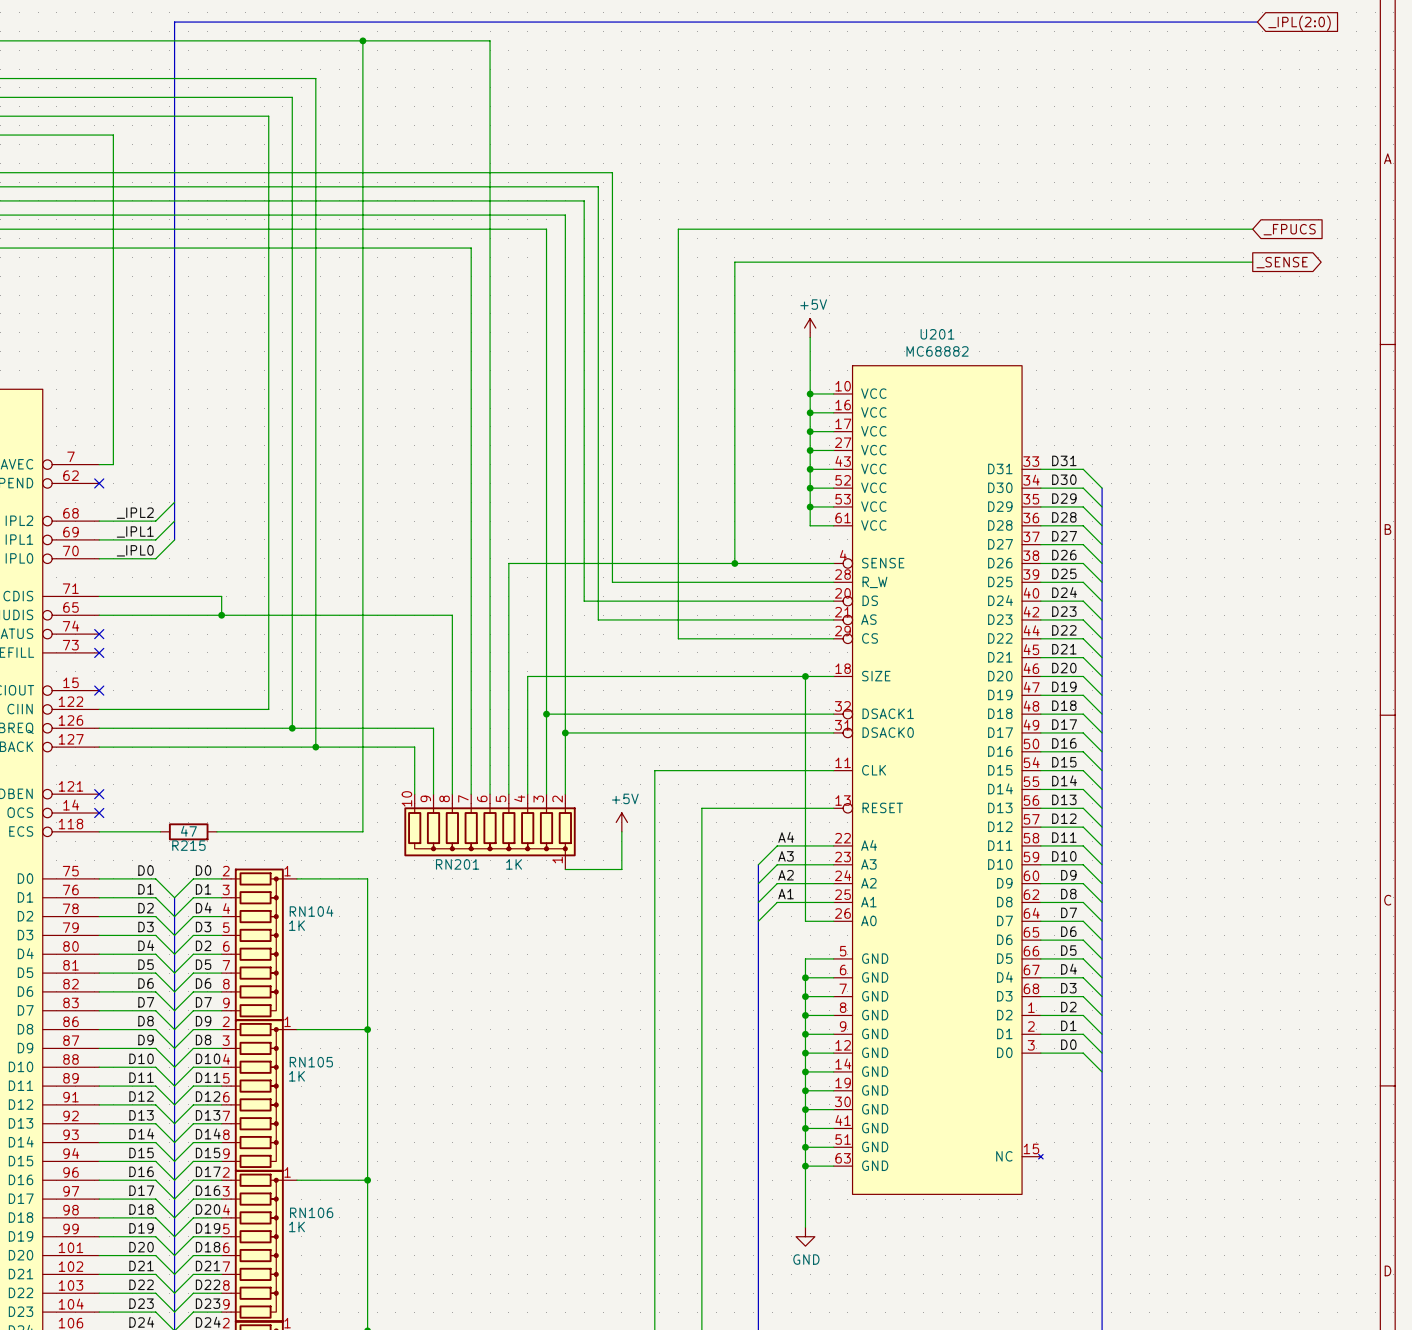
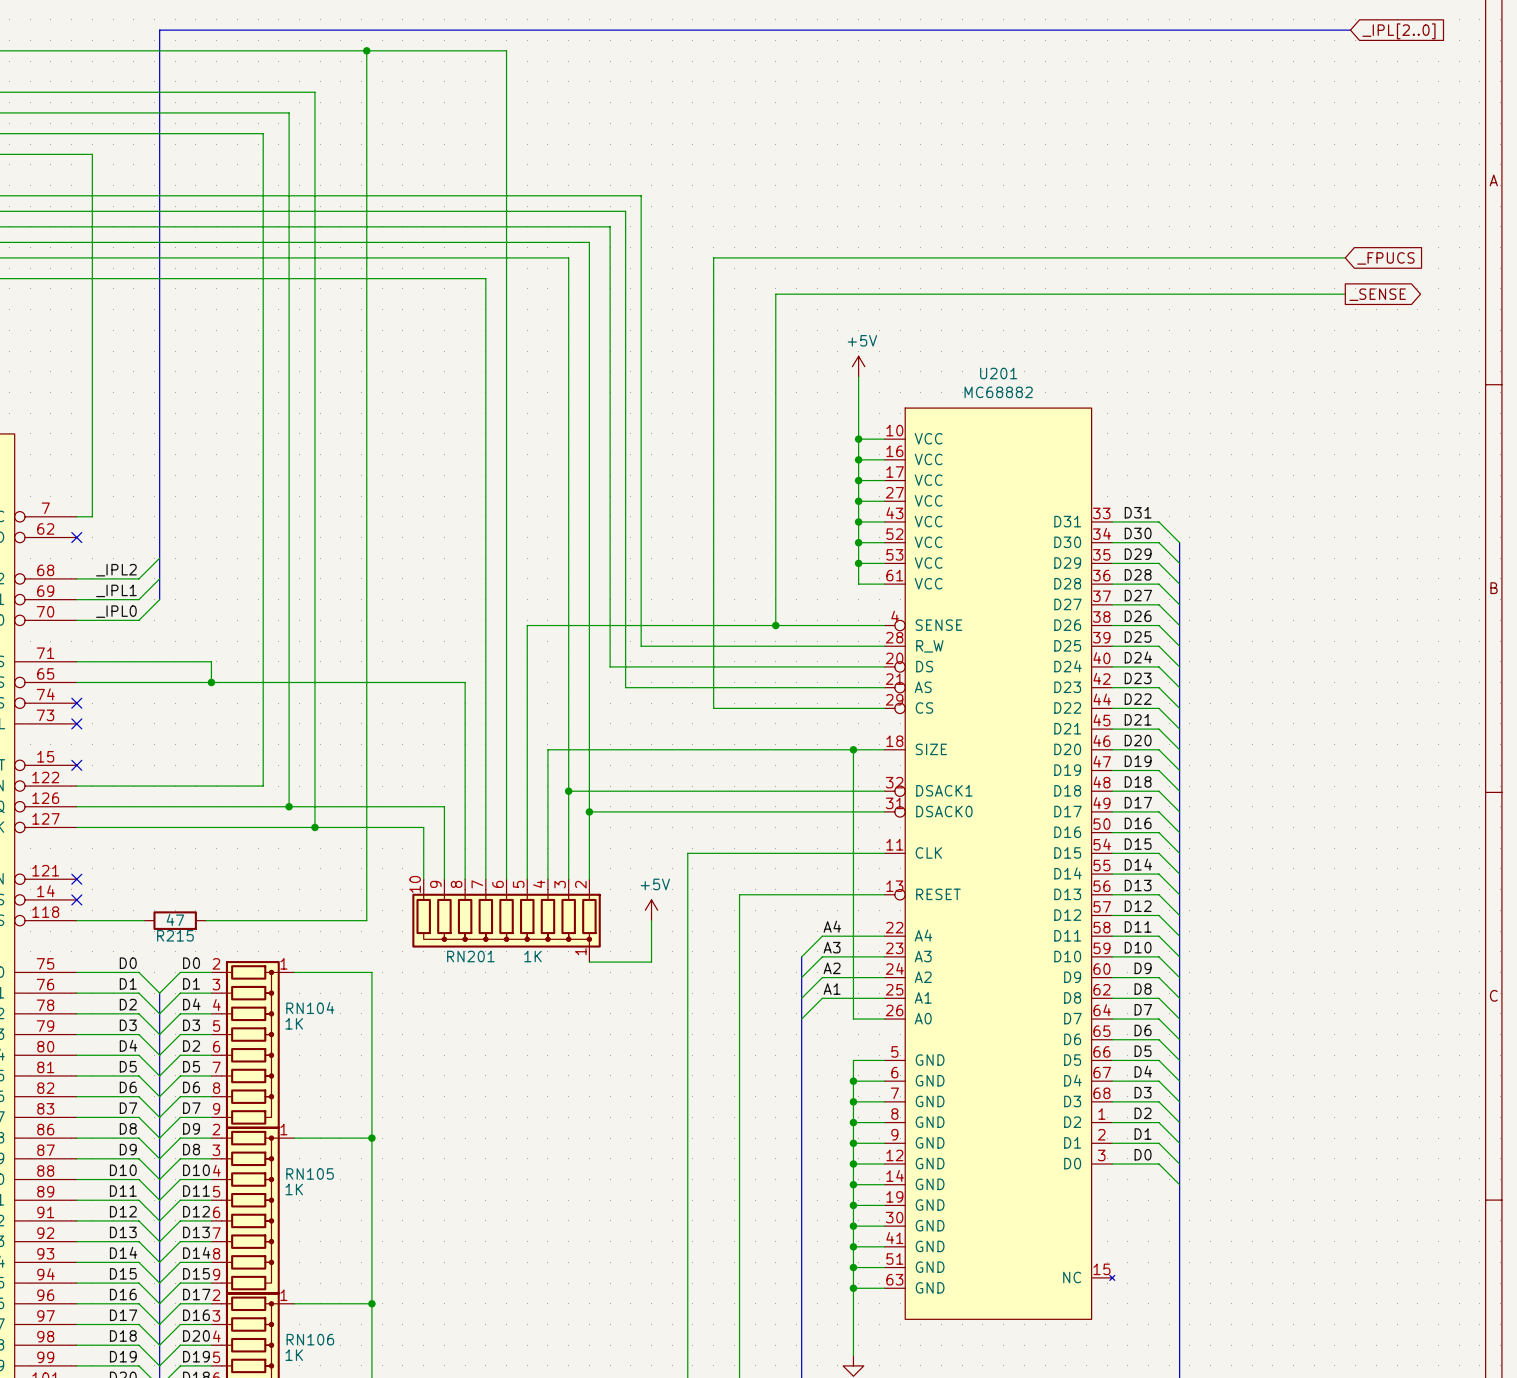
global label: _IPL(2:0) (1299, 23) -> _IPL[2..0] (1398, 31)

